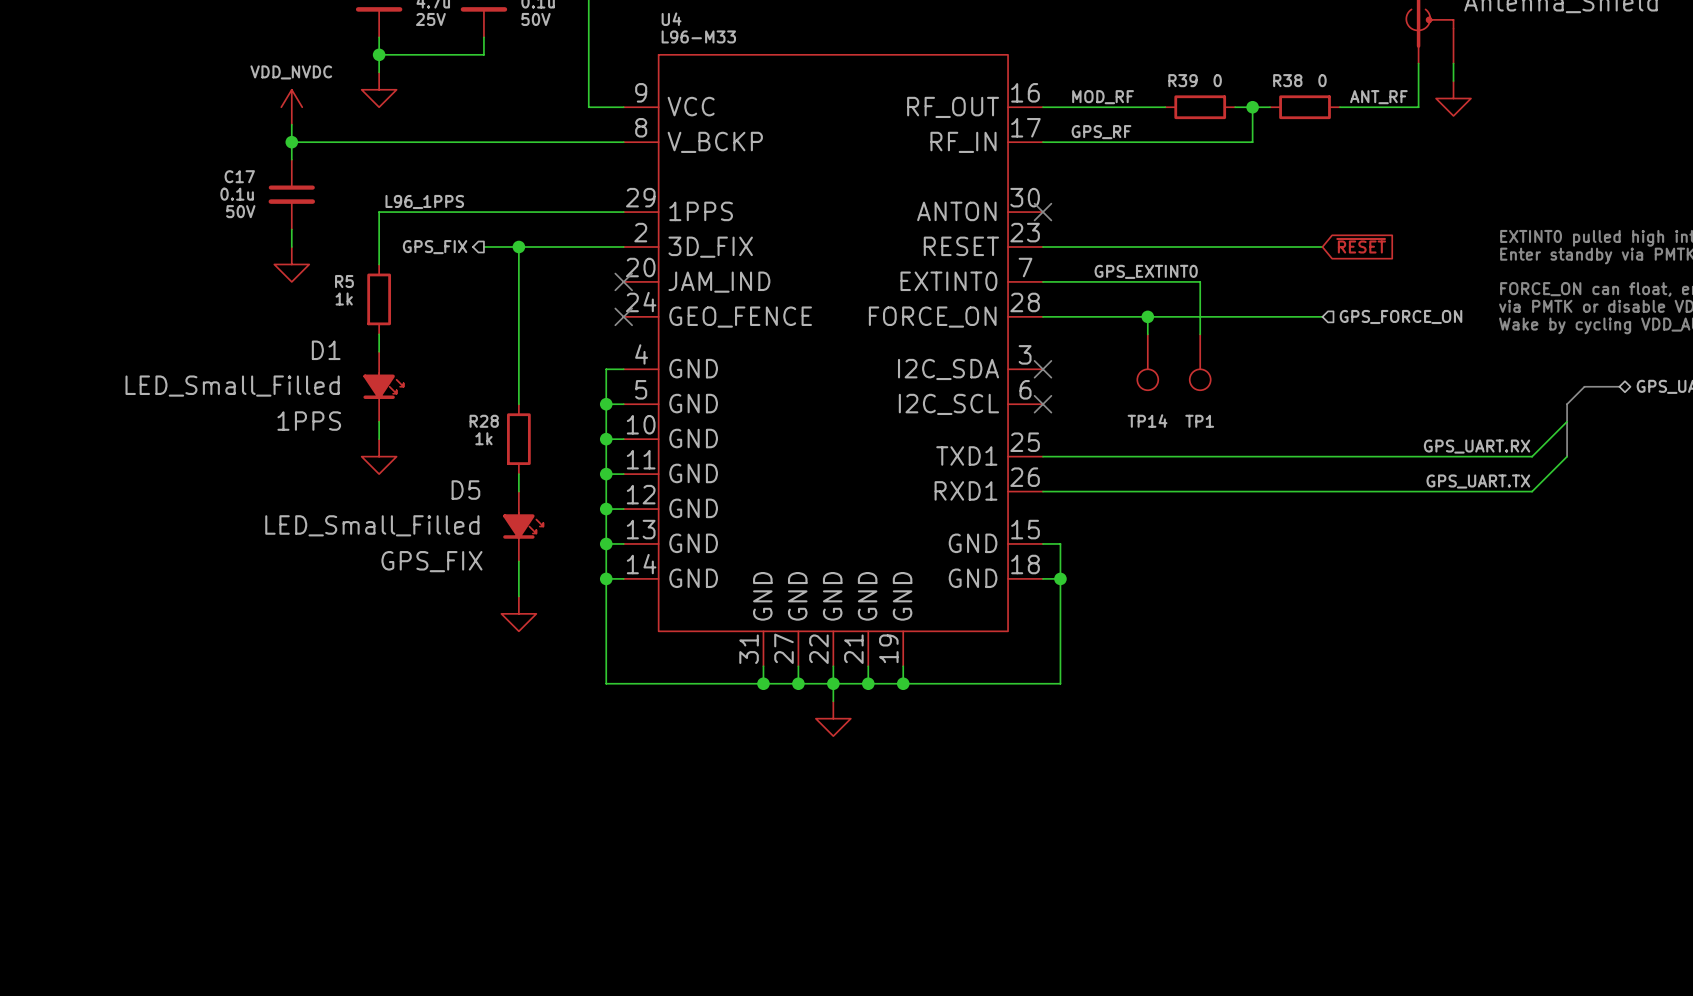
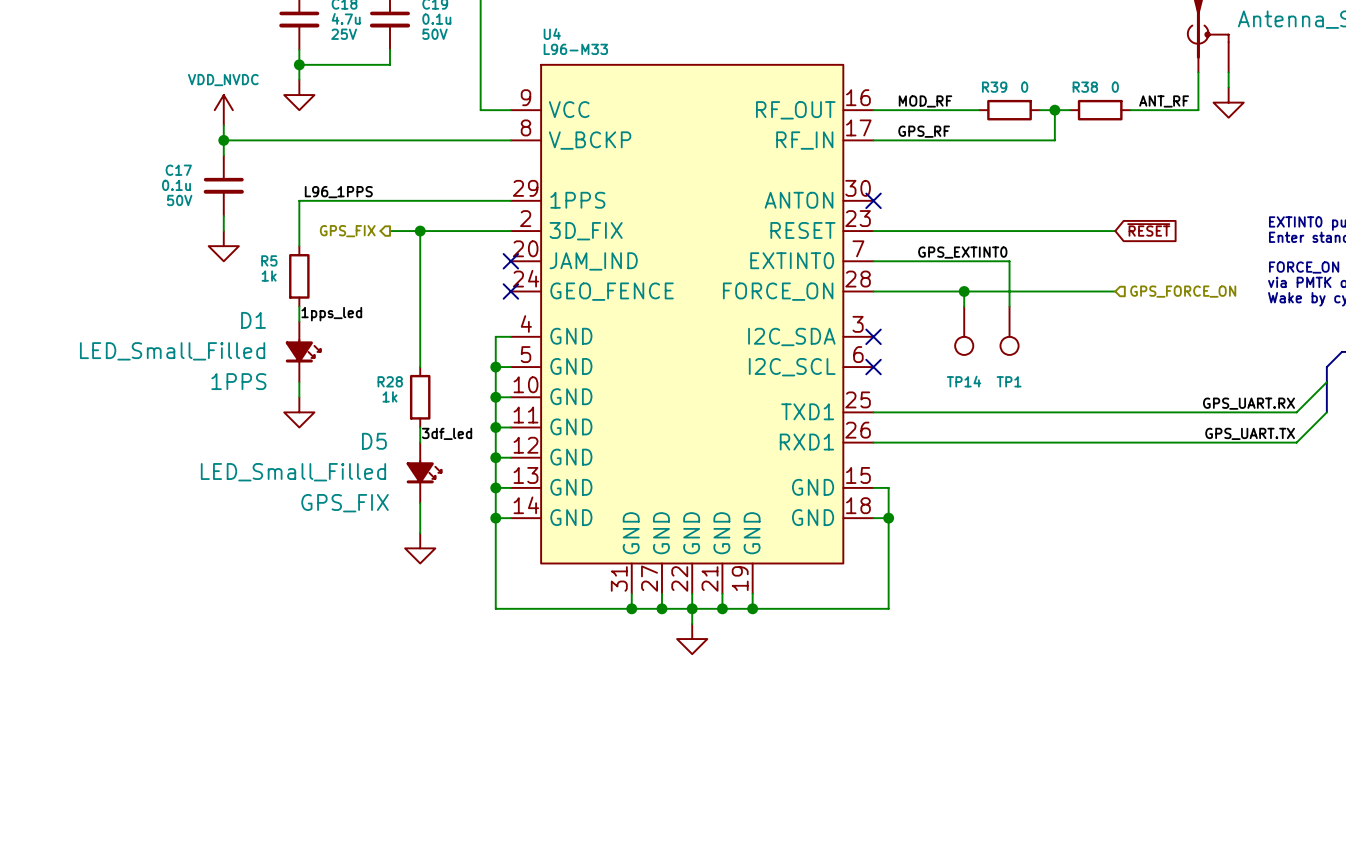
label: none -> 1pps_led (331, 314)
label: none -> 3df_led (447, 433)

